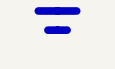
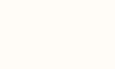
line: (38, 10) (76, 10) -> none
line: (47, 30) (67, 30) -> none

